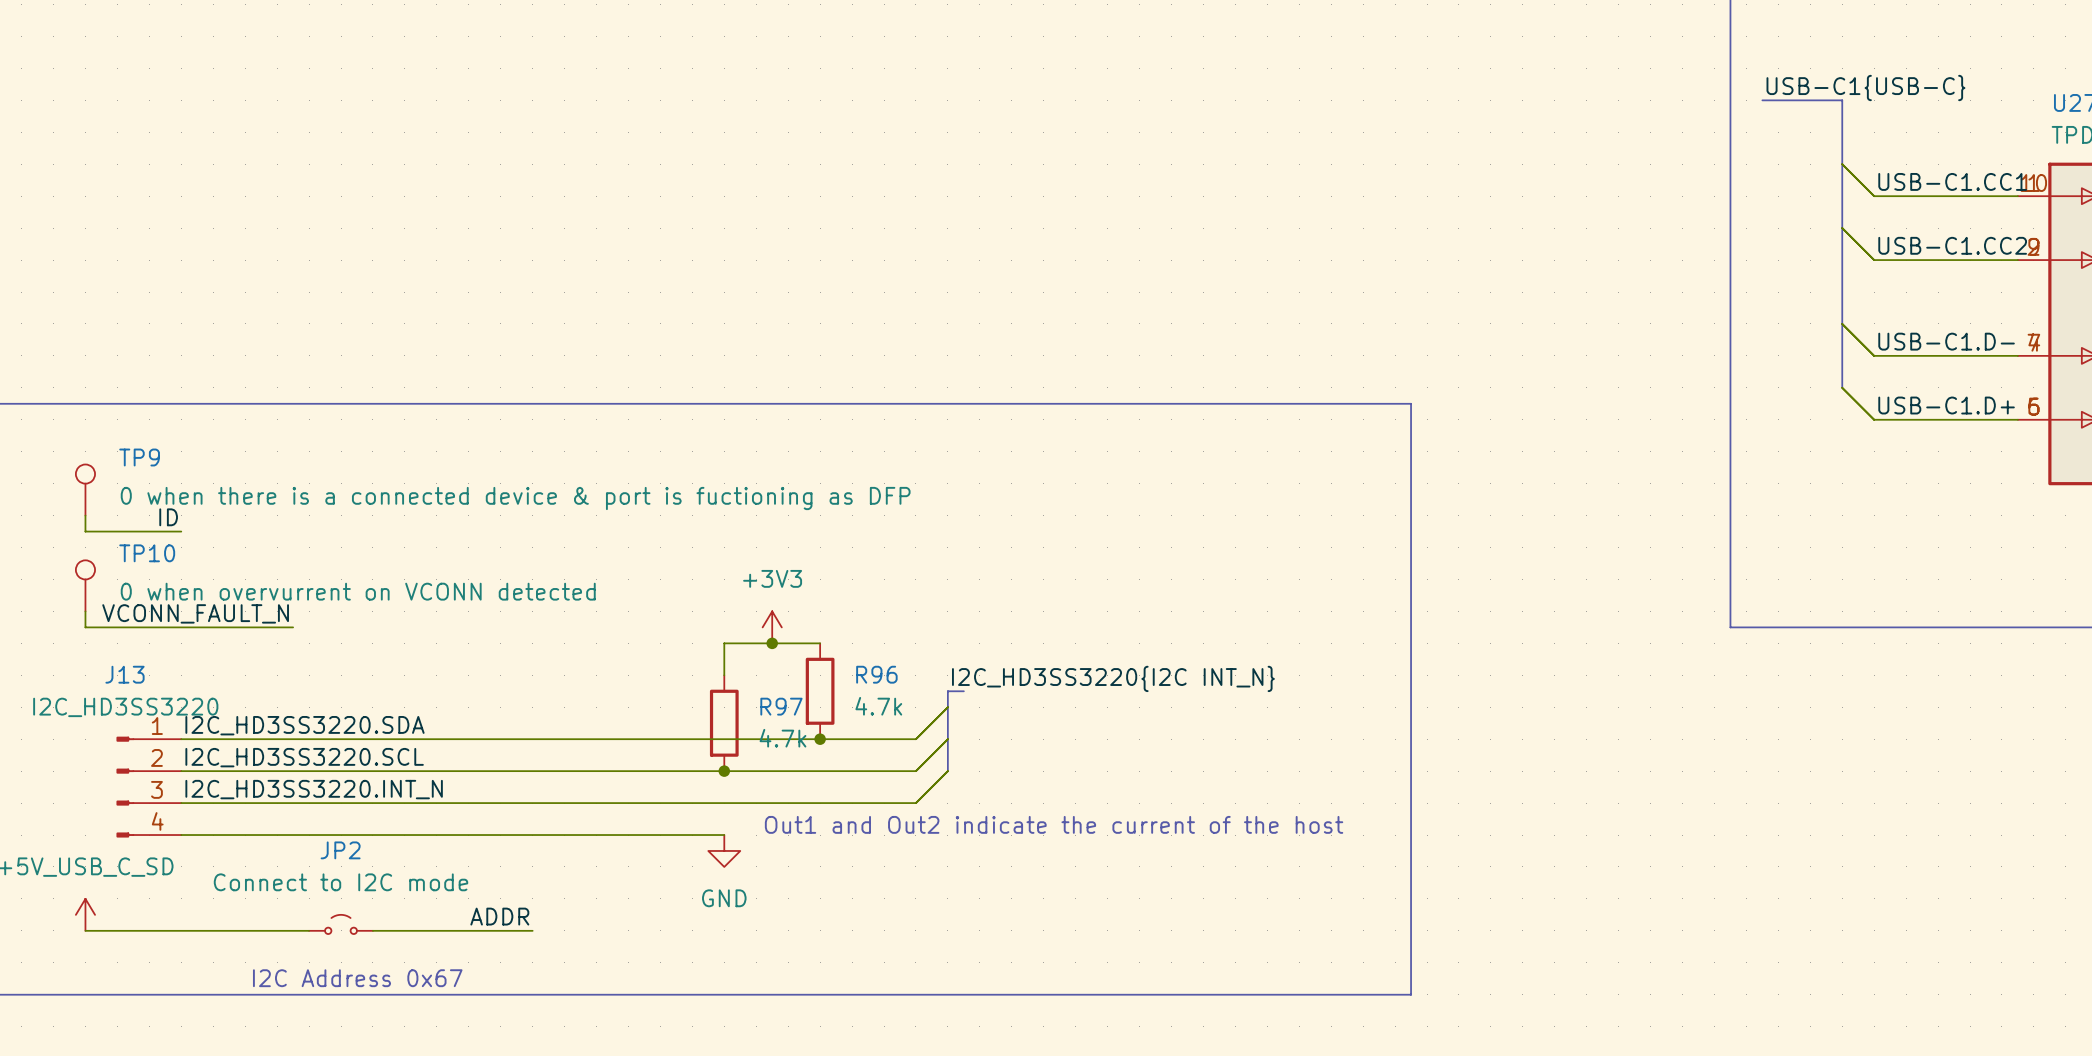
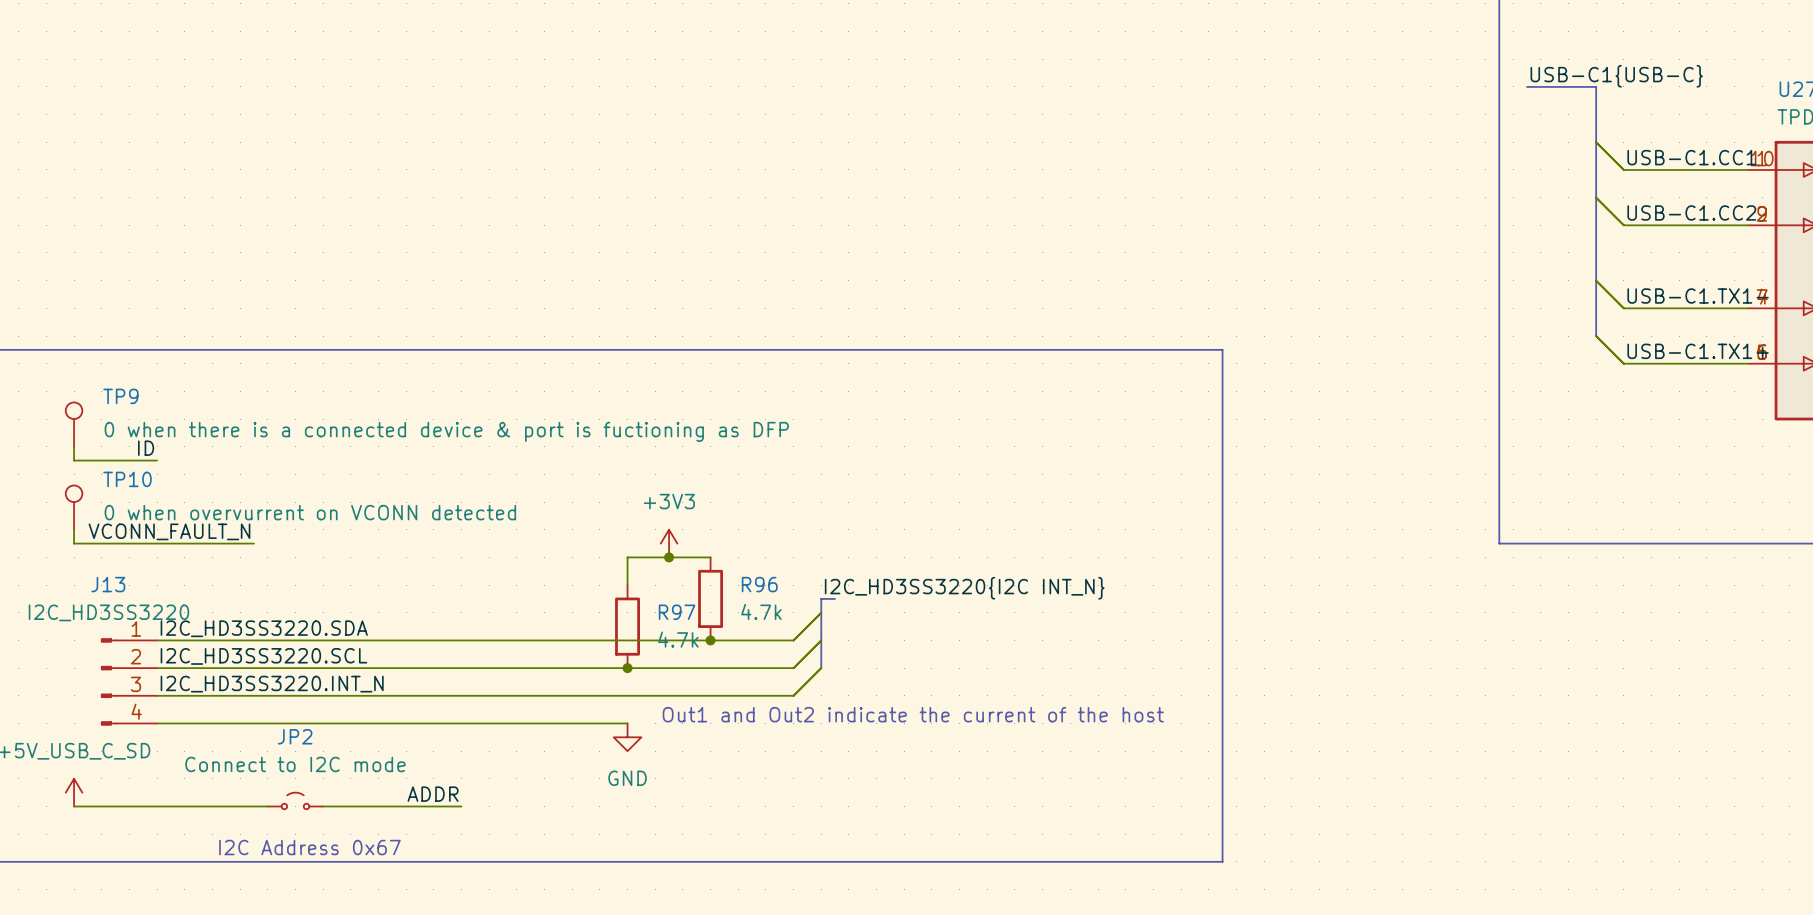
label: USB-C1.D- (1946, 341) -> USB-C1.TX1- (1698, 296)
label: USB-C1.D+ (1946, 405) -> USB-C1.TX1+ (1698, 351)

